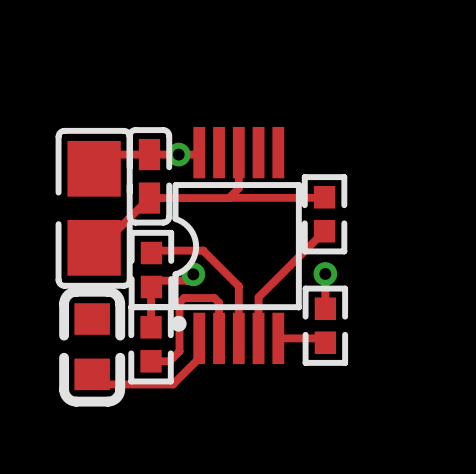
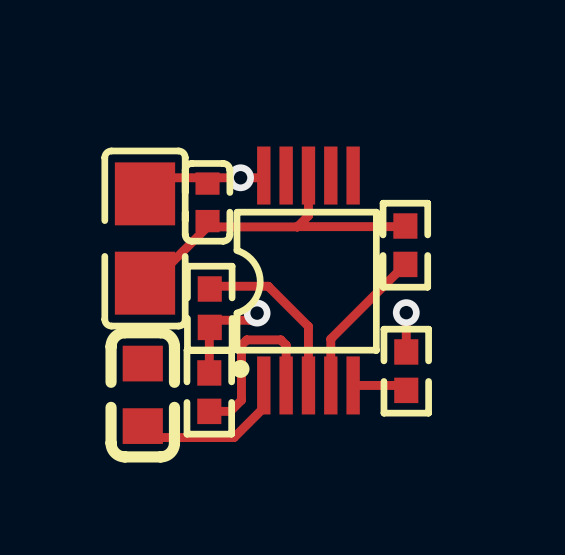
part footprint: [126, 127, 173, 226] -> [181, 160, 234, 245]

